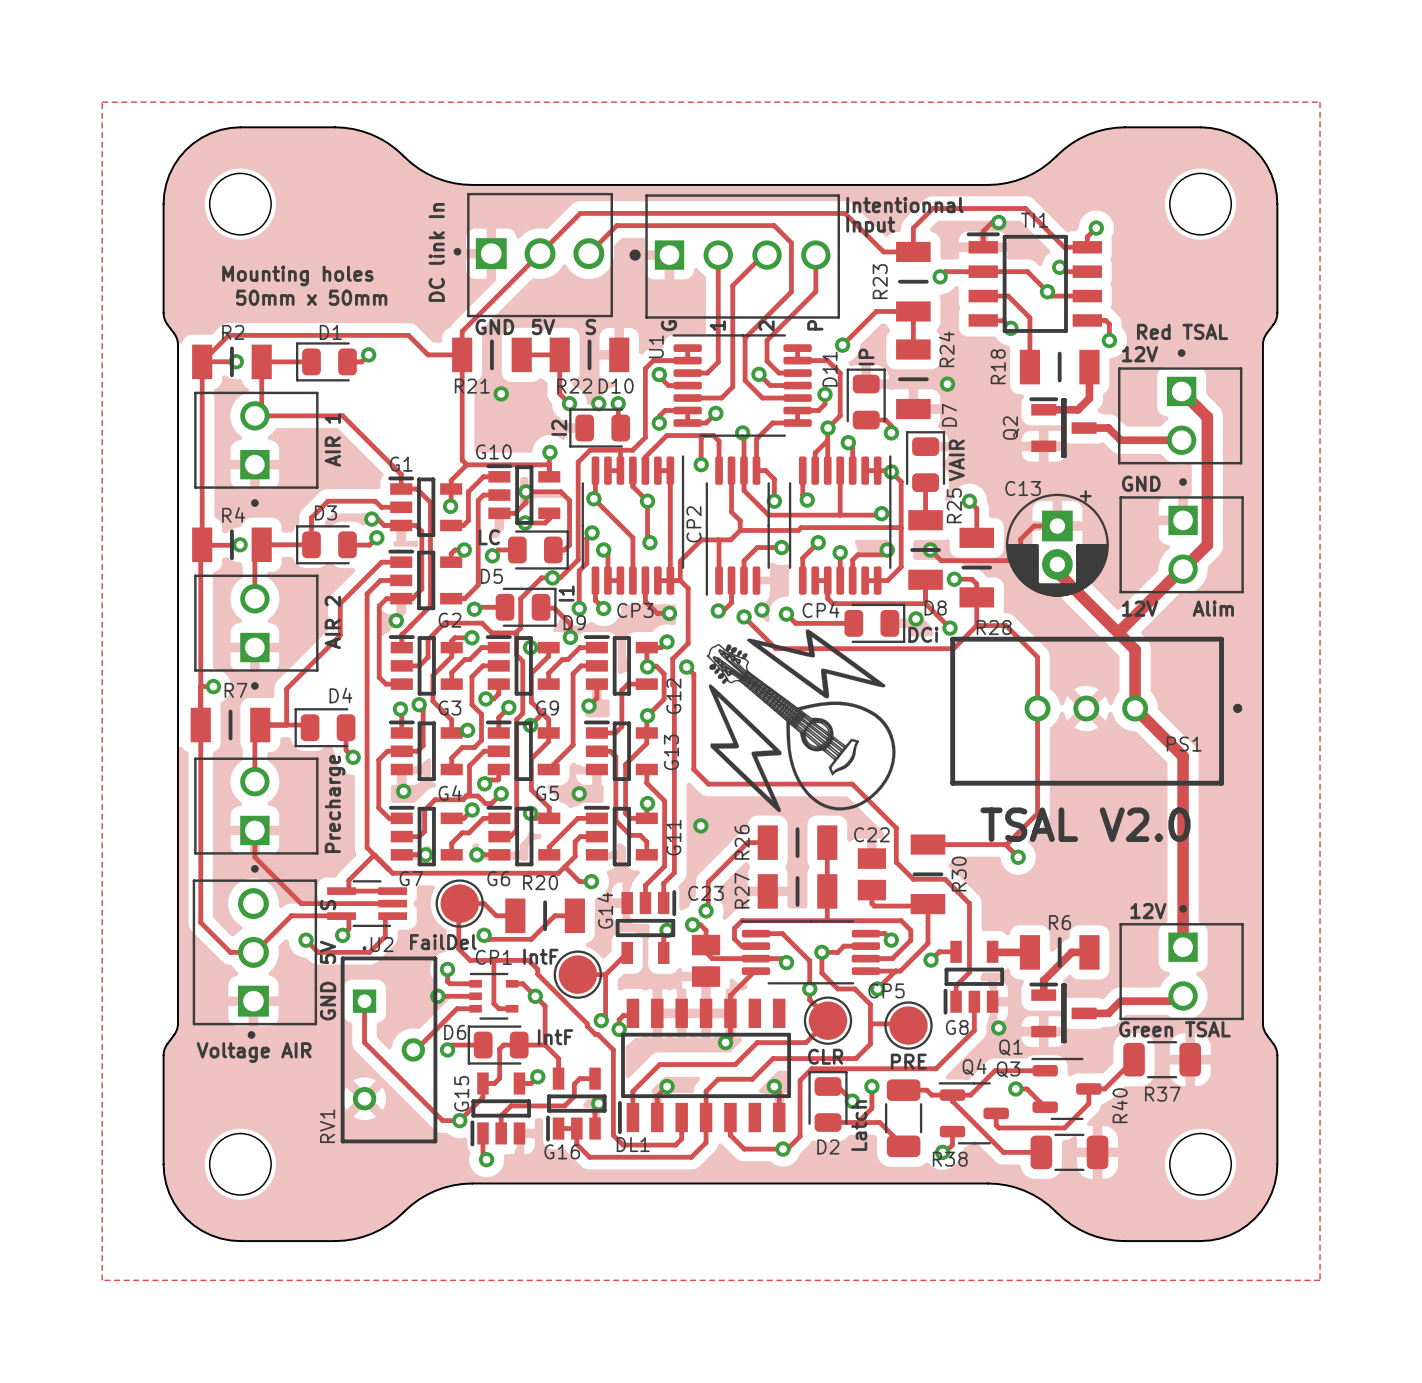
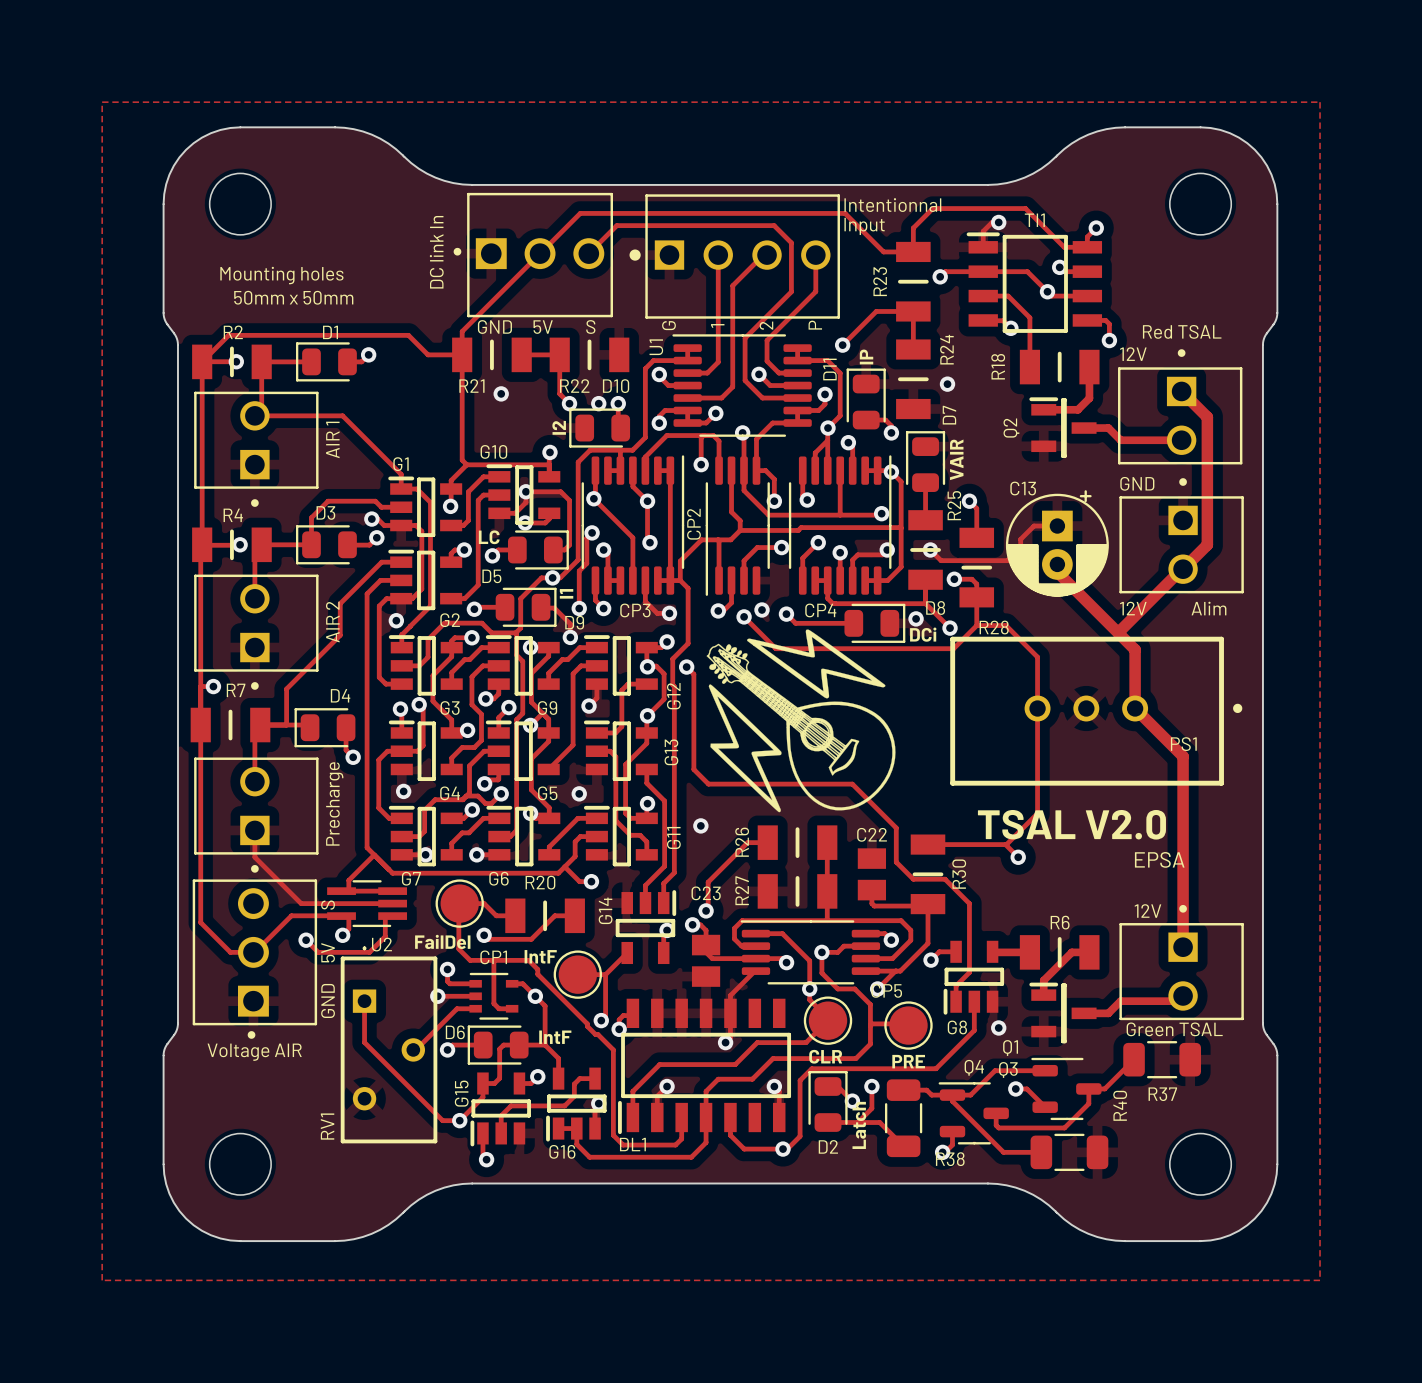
text: none -> EPSA (1159, 859)

